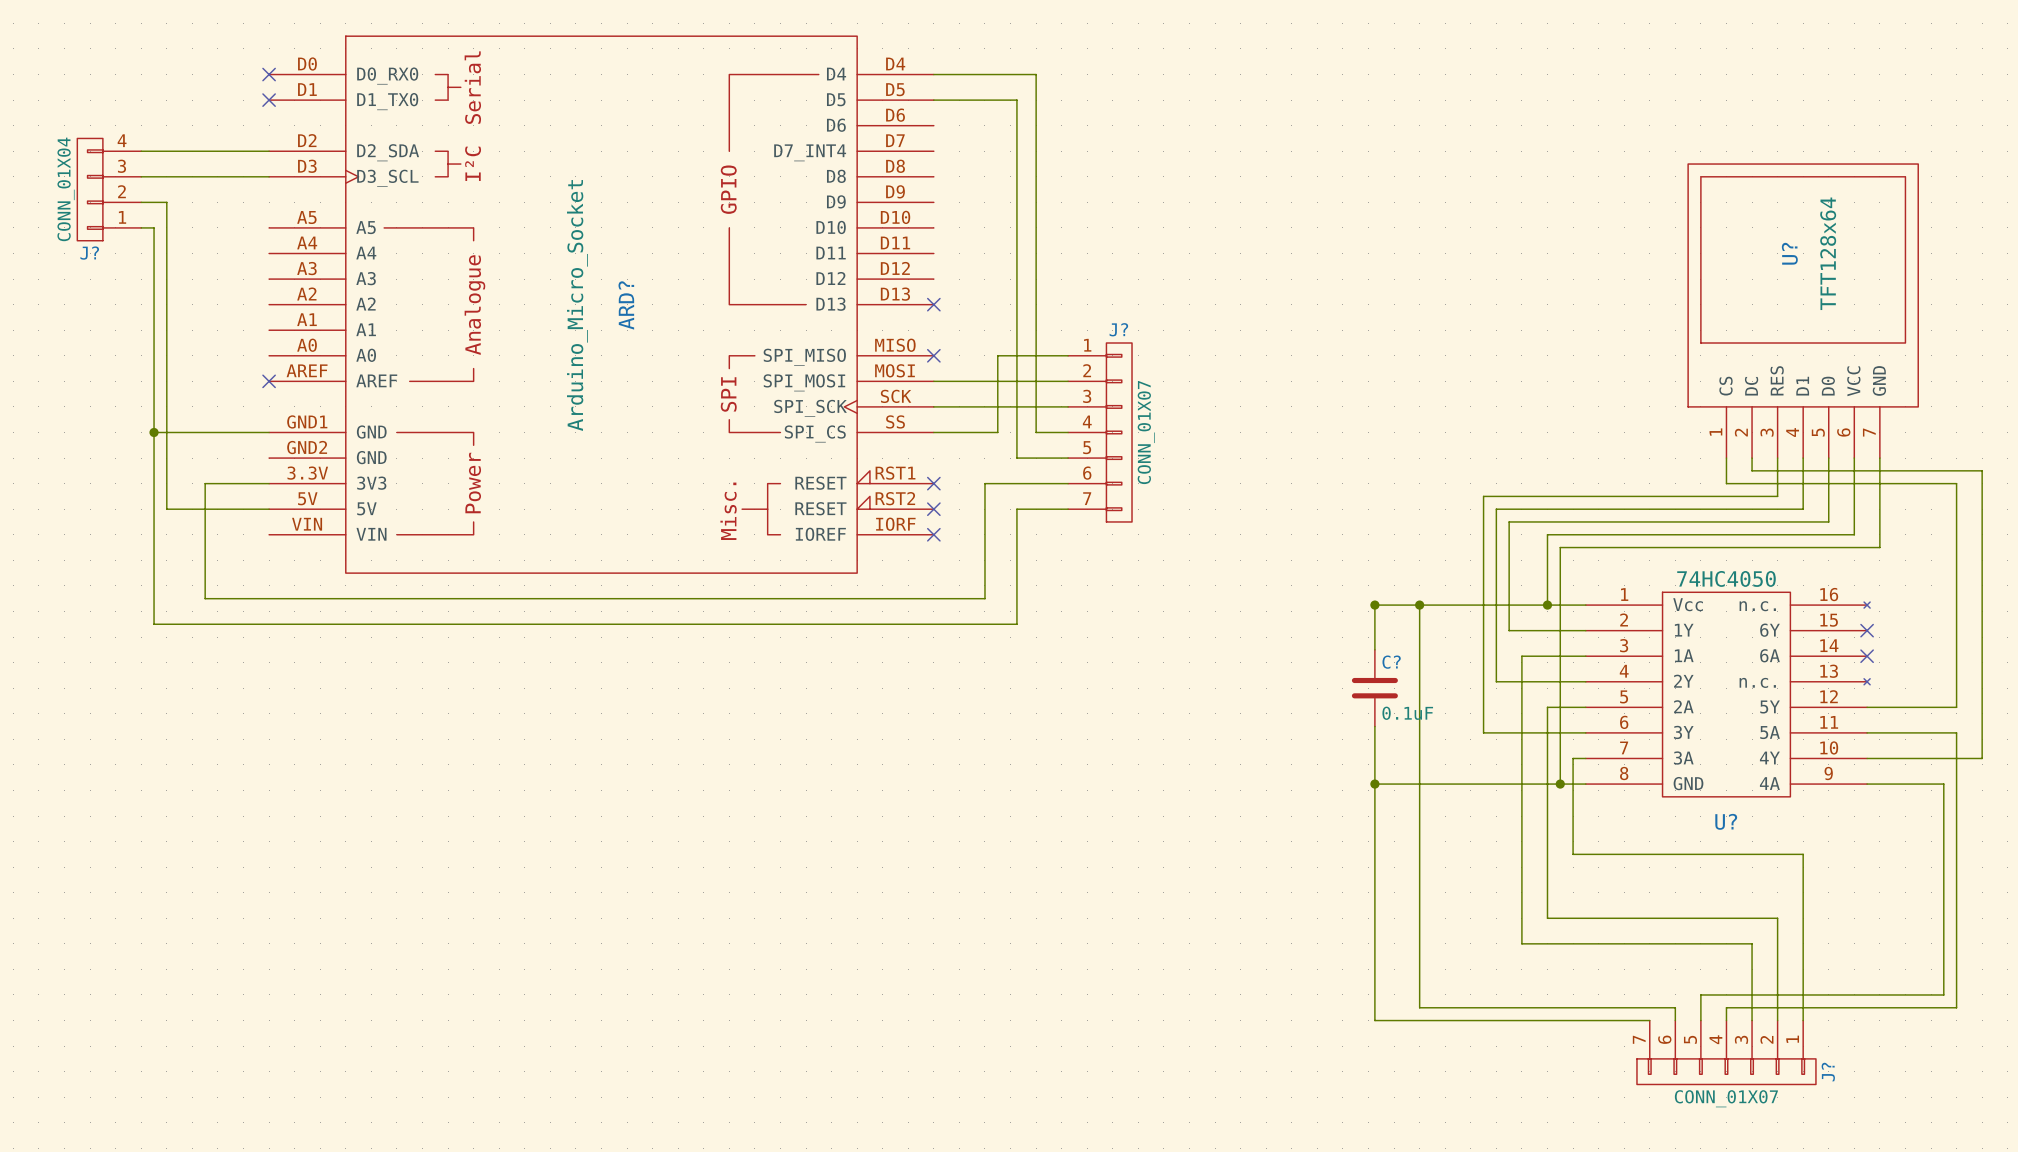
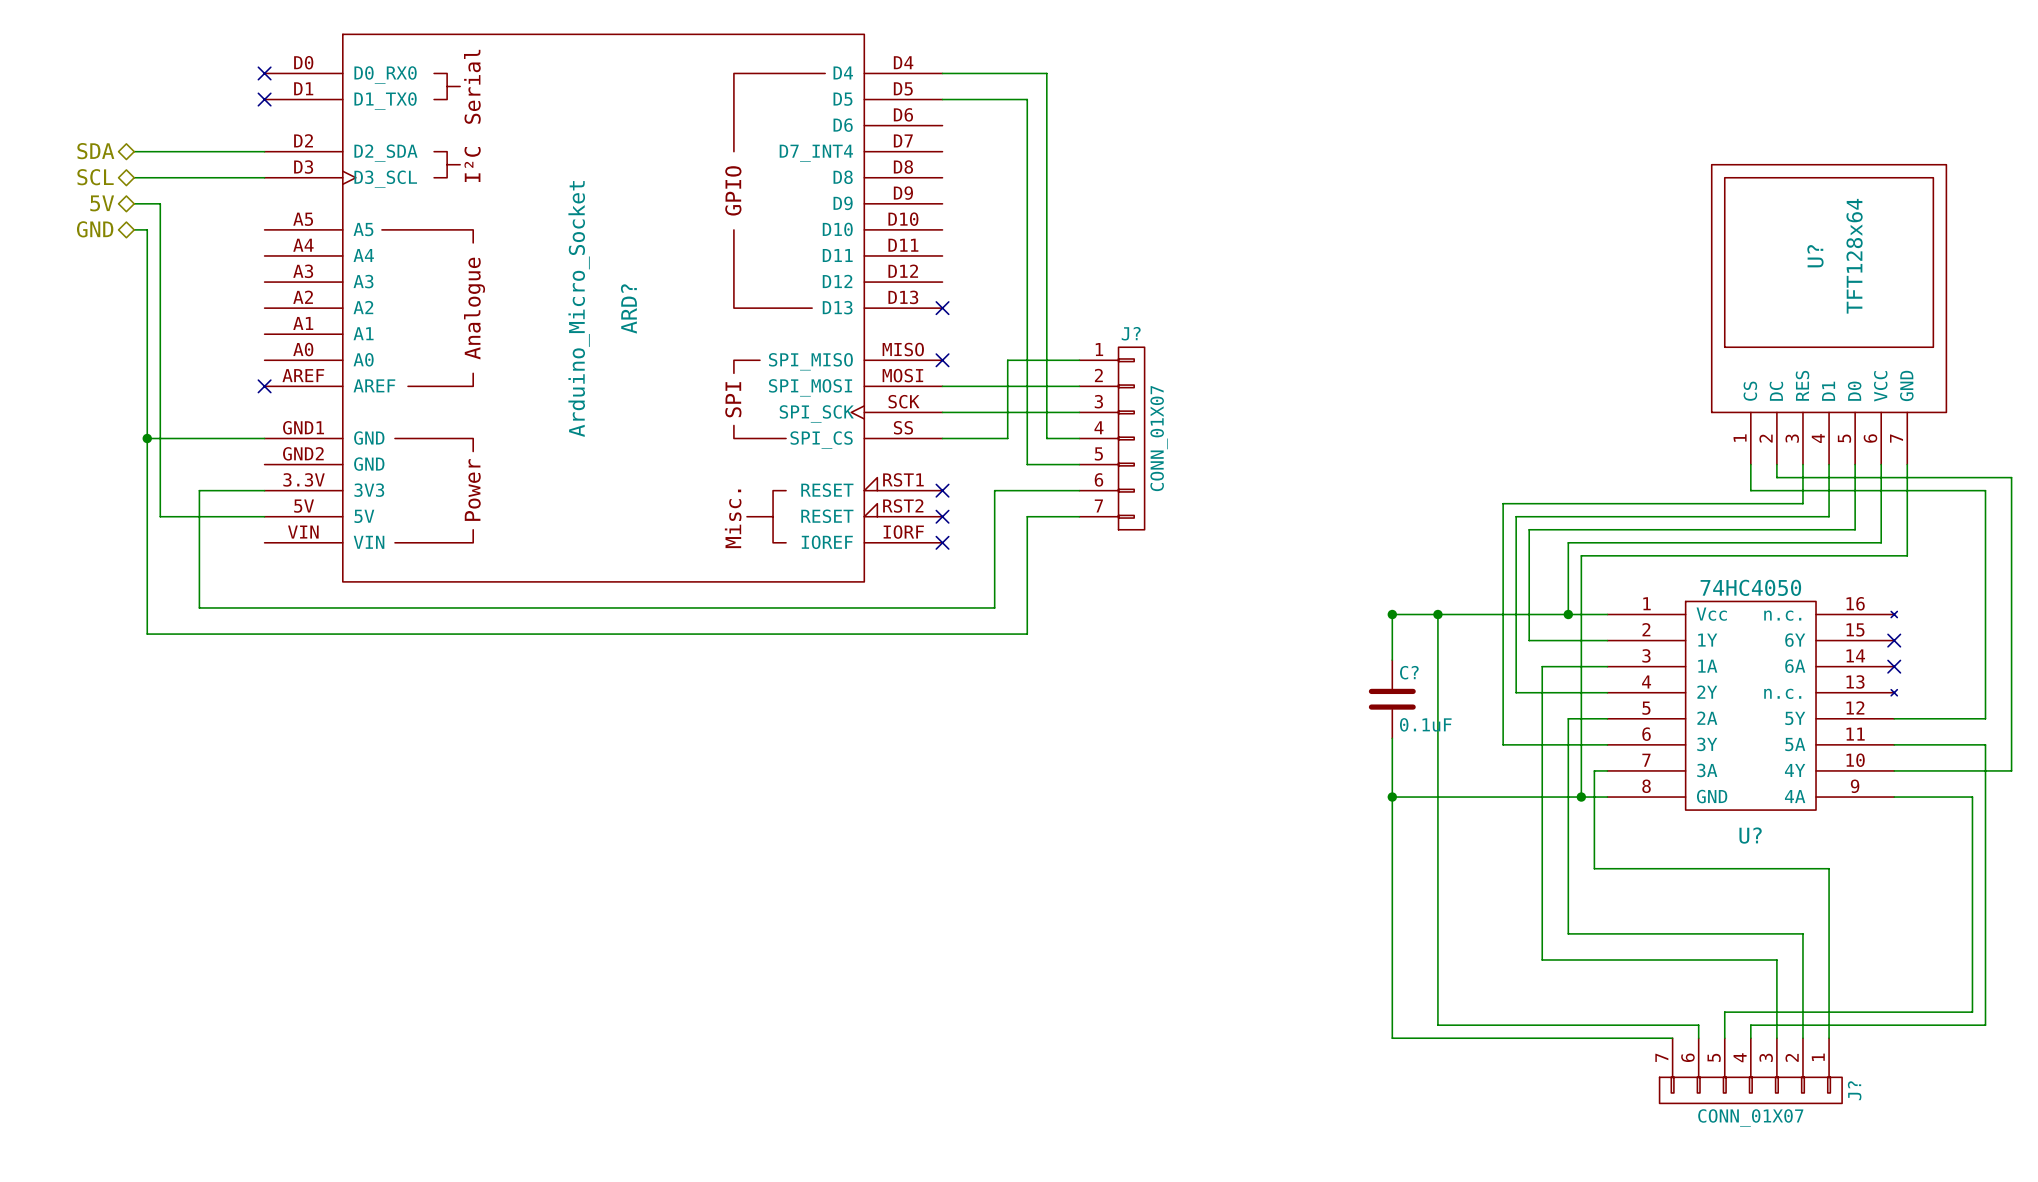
hierarchical label: none -> SDA (95, 151)
hierarchical label: none -> SCL (95, 177)
J?: CONN_01X04 (109, 189) -> none
hierarchical label: none -> 5V (102, 203)
hierarchical label: none -> GND (95, 229)

